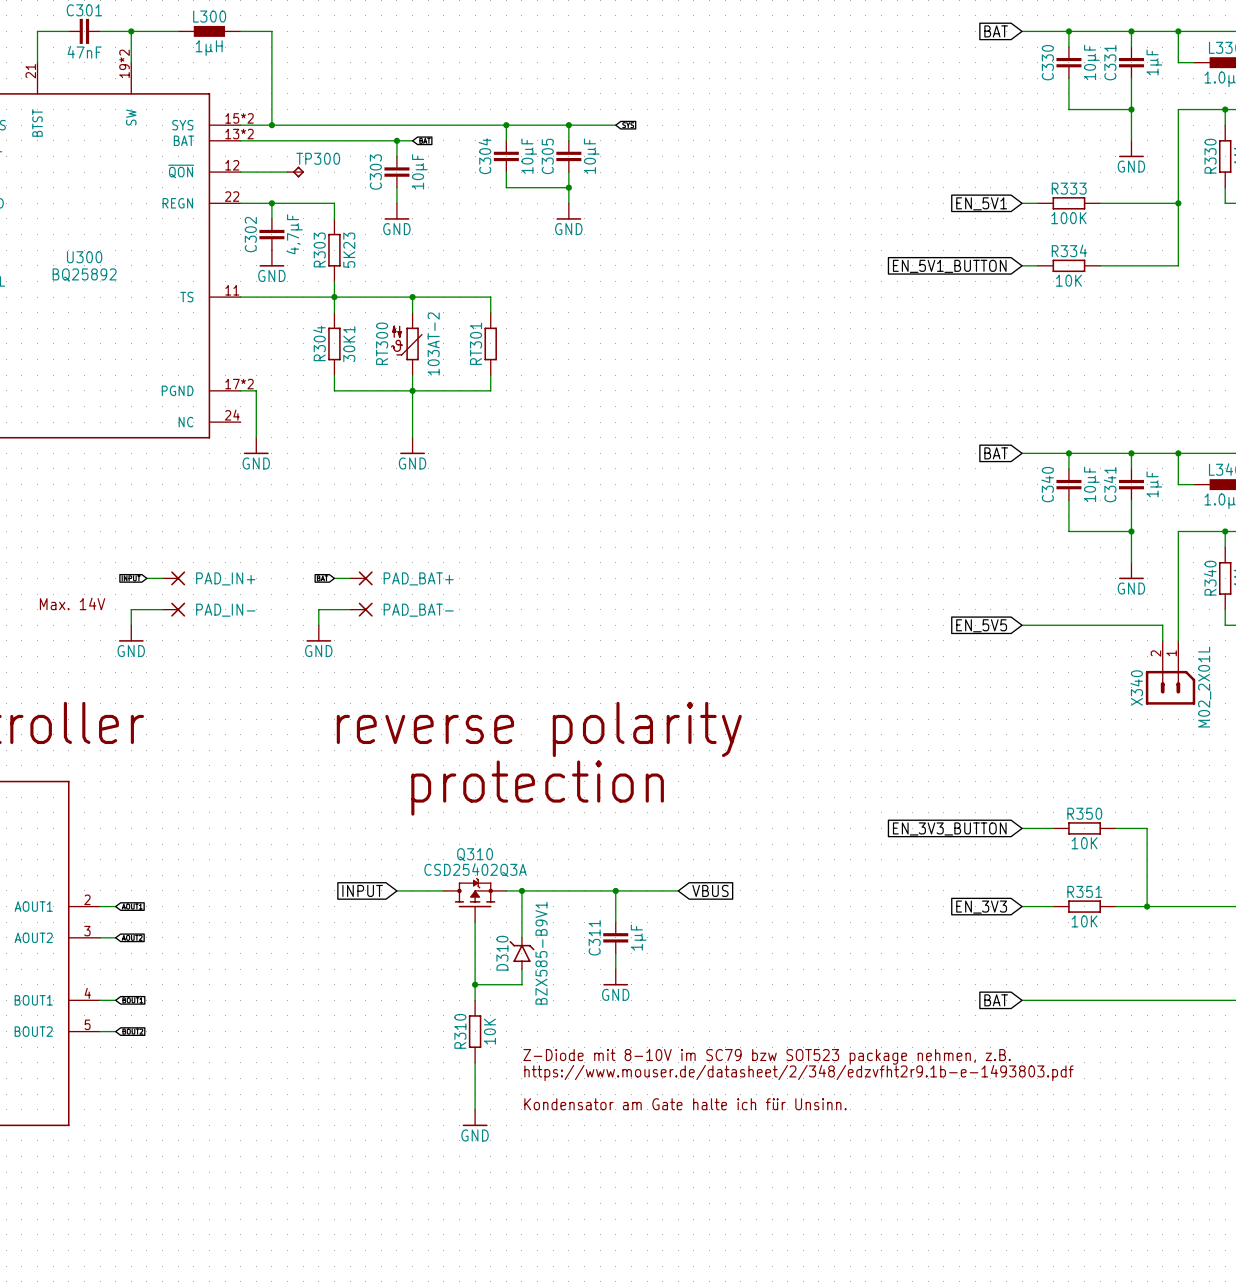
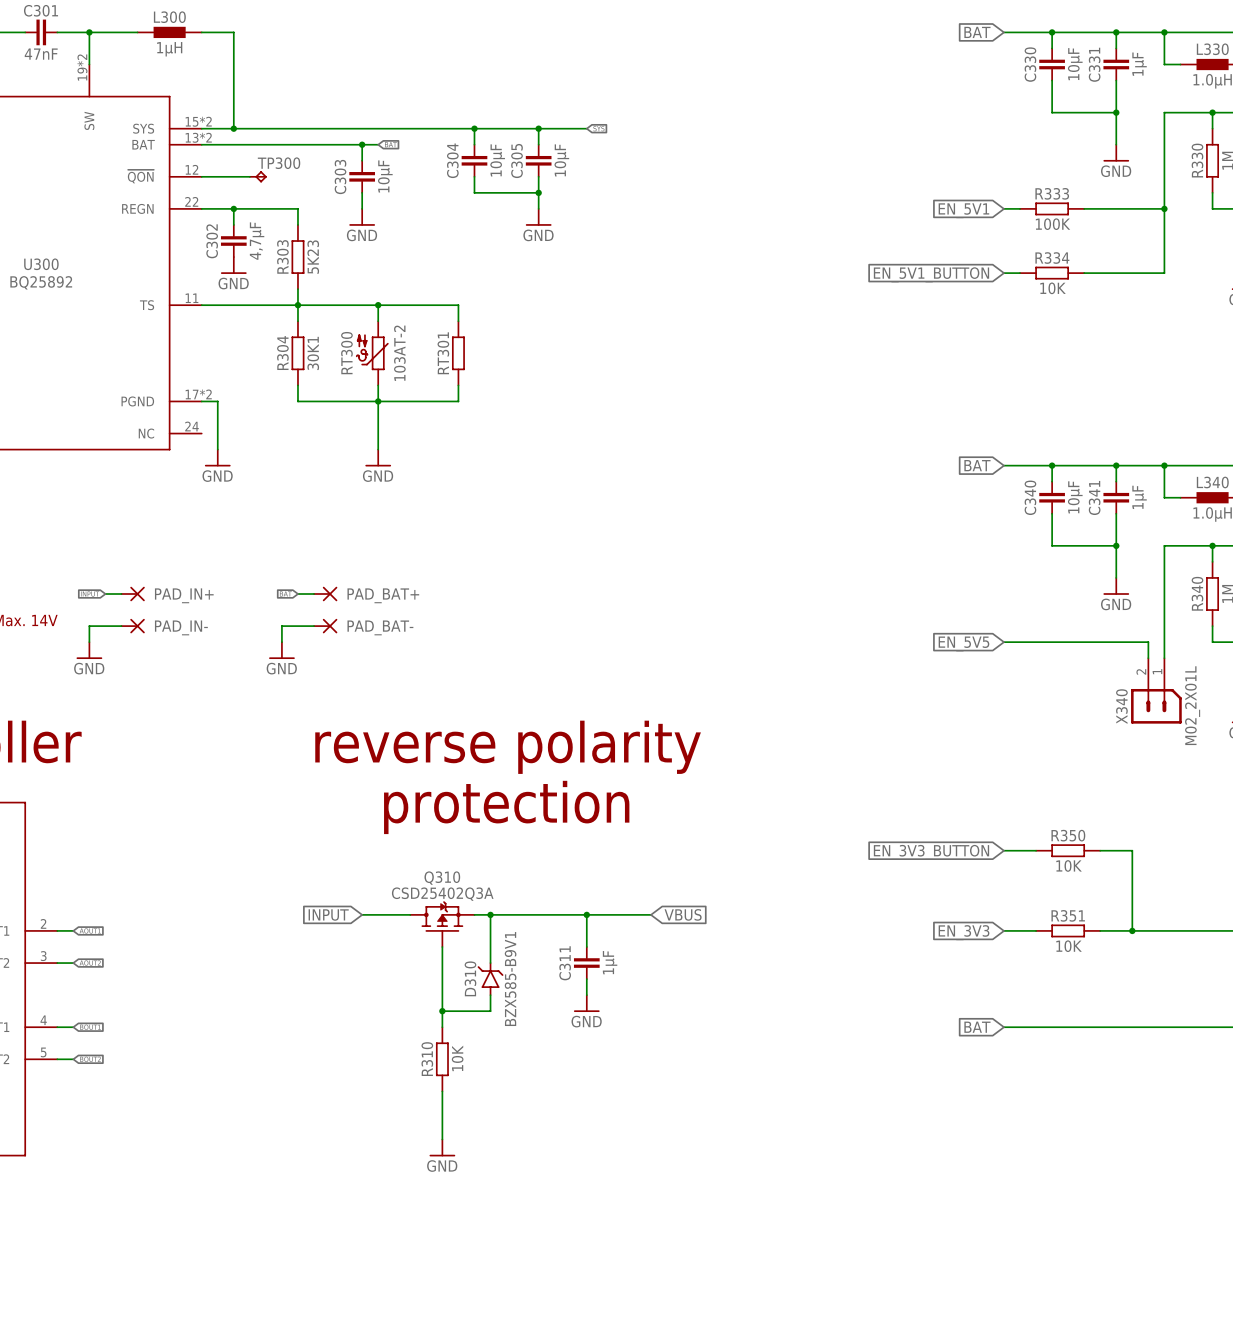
text: Z-Diode mit 8-10V im SC79 bzw SOT523 package nehmen, z.B. (767, 1056) -> none
text: https://www.mouser.de/datasheet/2/348/edzvfht2r9.1b-e-1493803.pdf (798, 1073) -> none
text: Kondensator am Gate halte ich für Unsinn. (685, 1104) -> none

